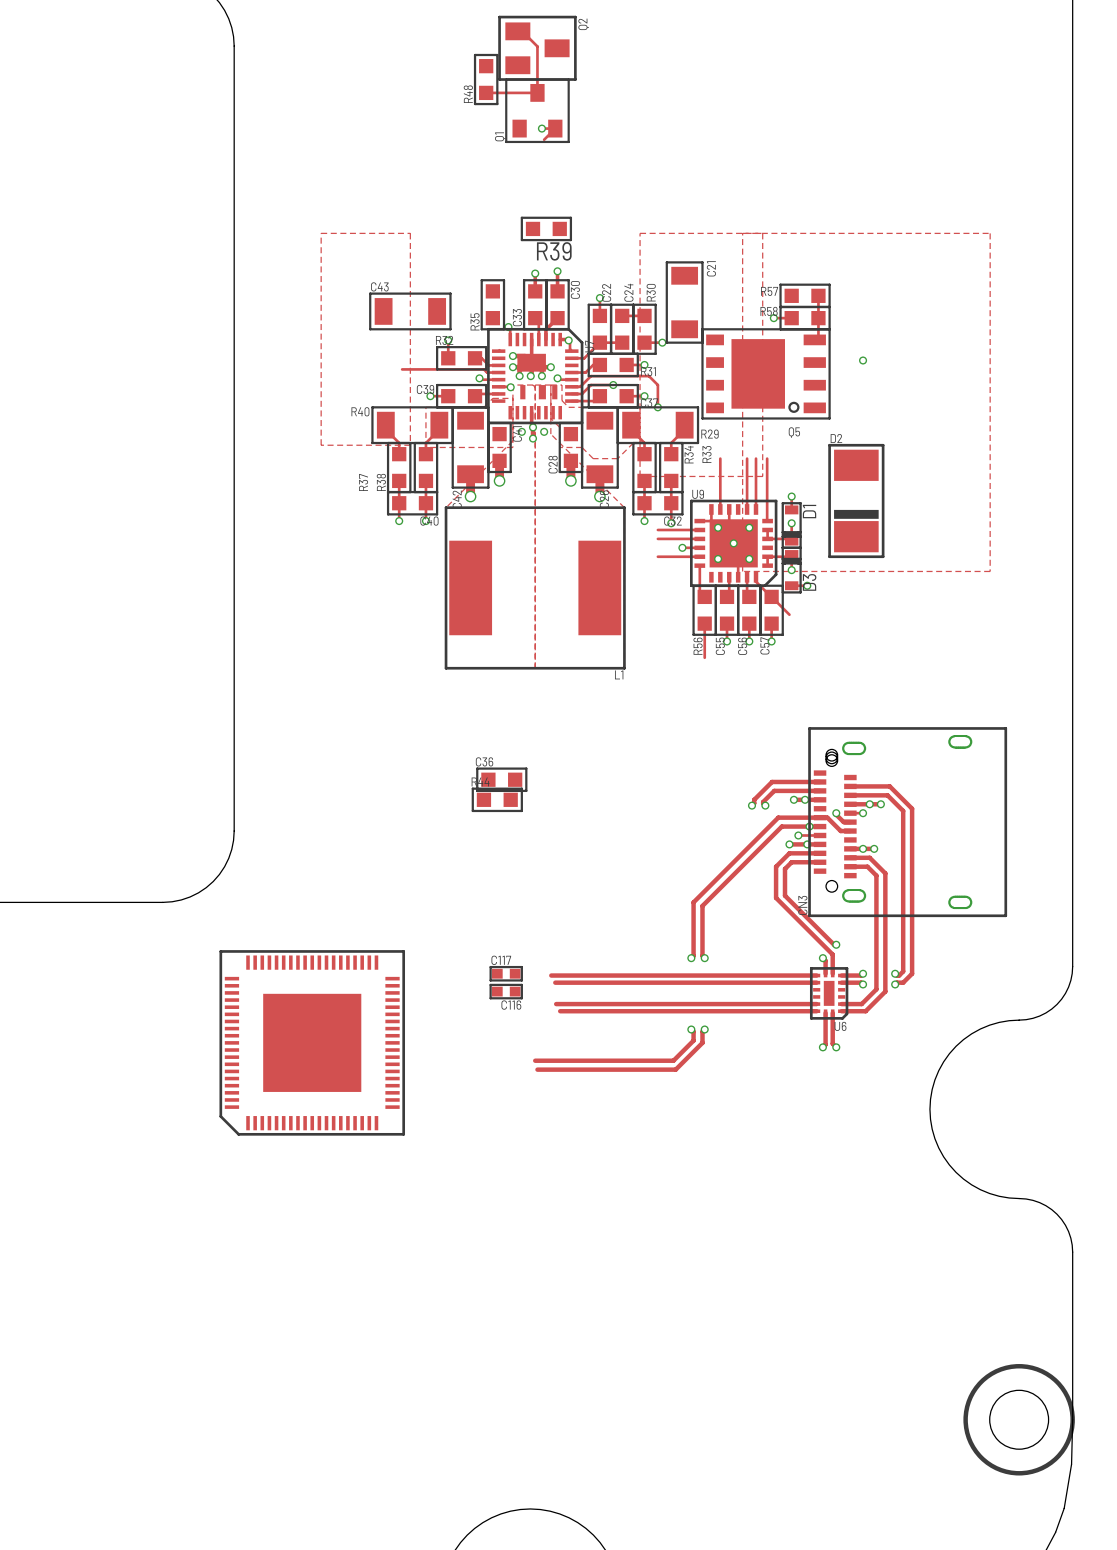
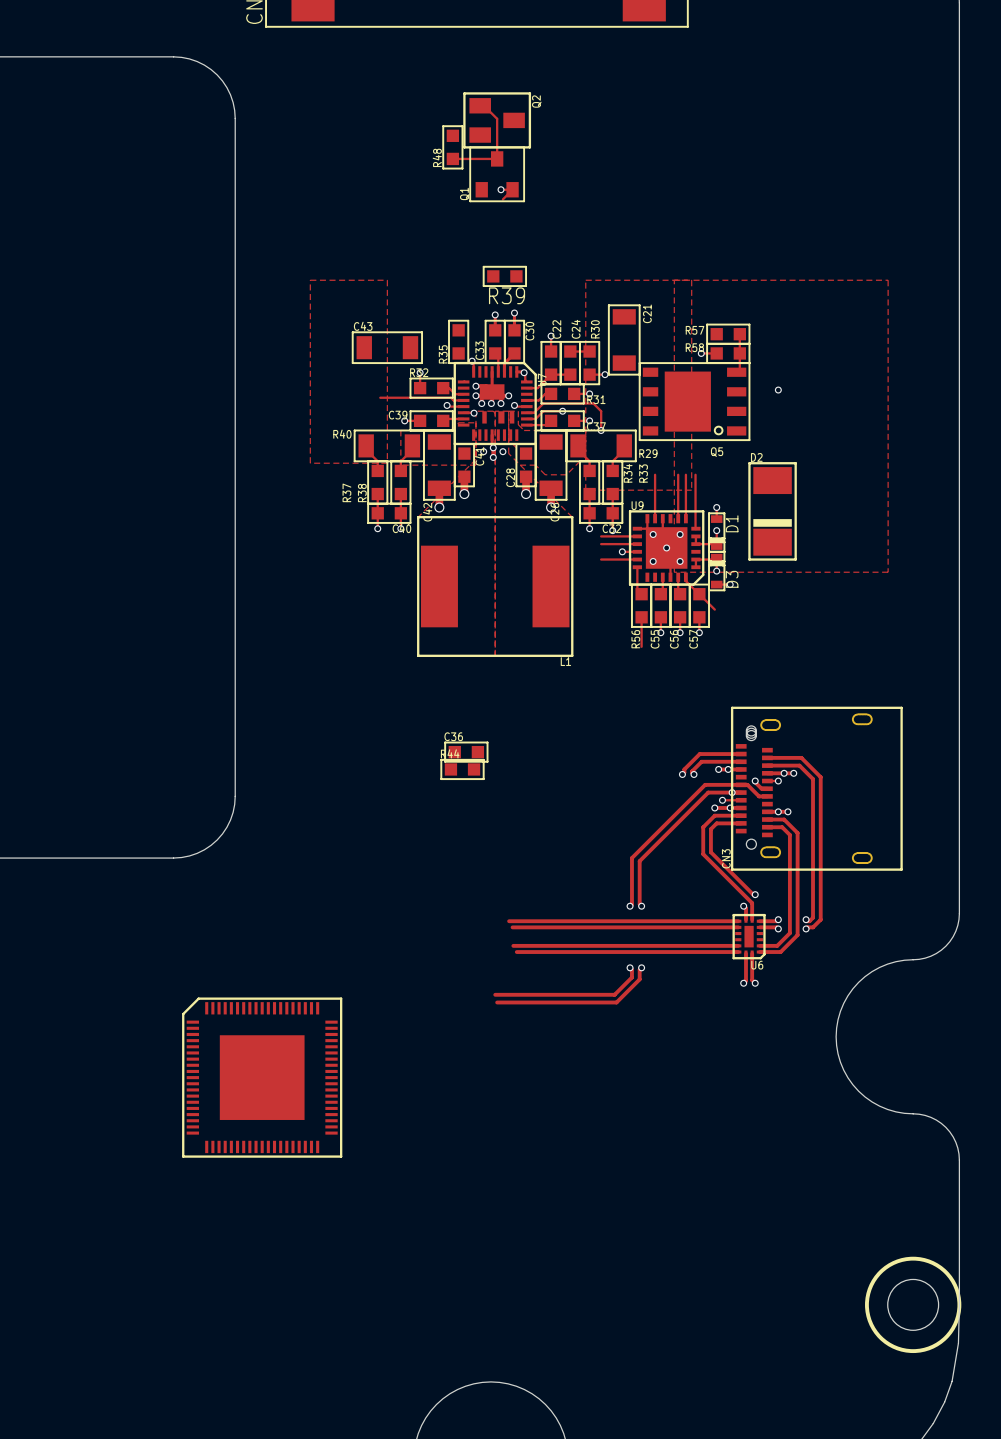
C117: (506, 973) -> none
C116: (506, 991) -> none
part rotation: 0° (312, 1042) -> 90° clockwise (262, 1077)
part position: (312, 1042) -> (262, 1077)

